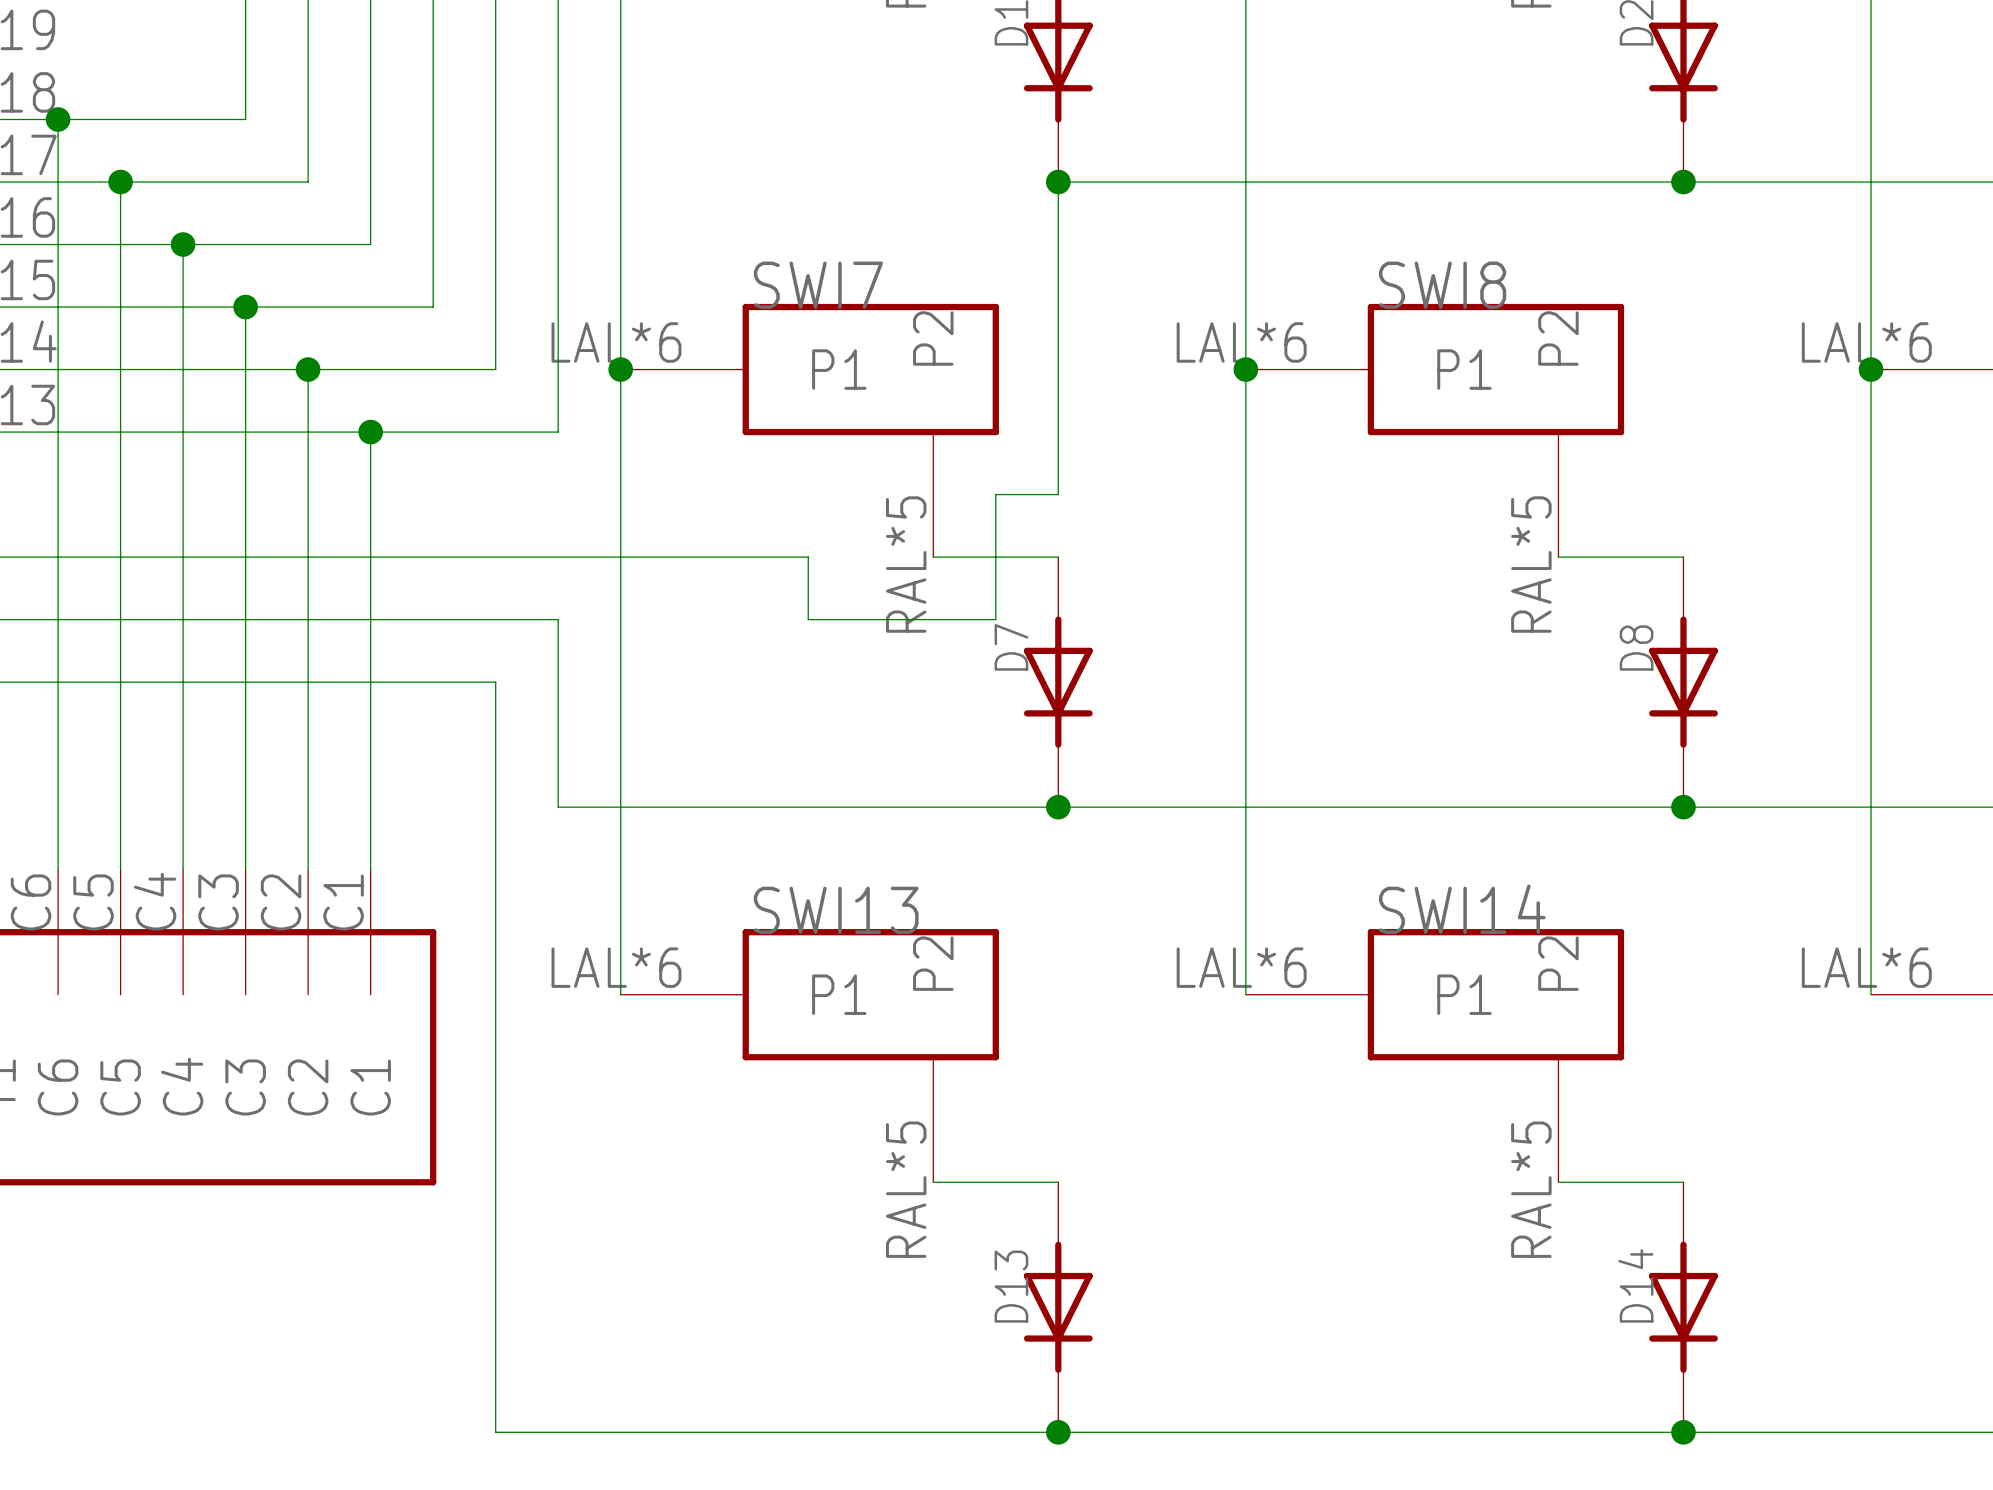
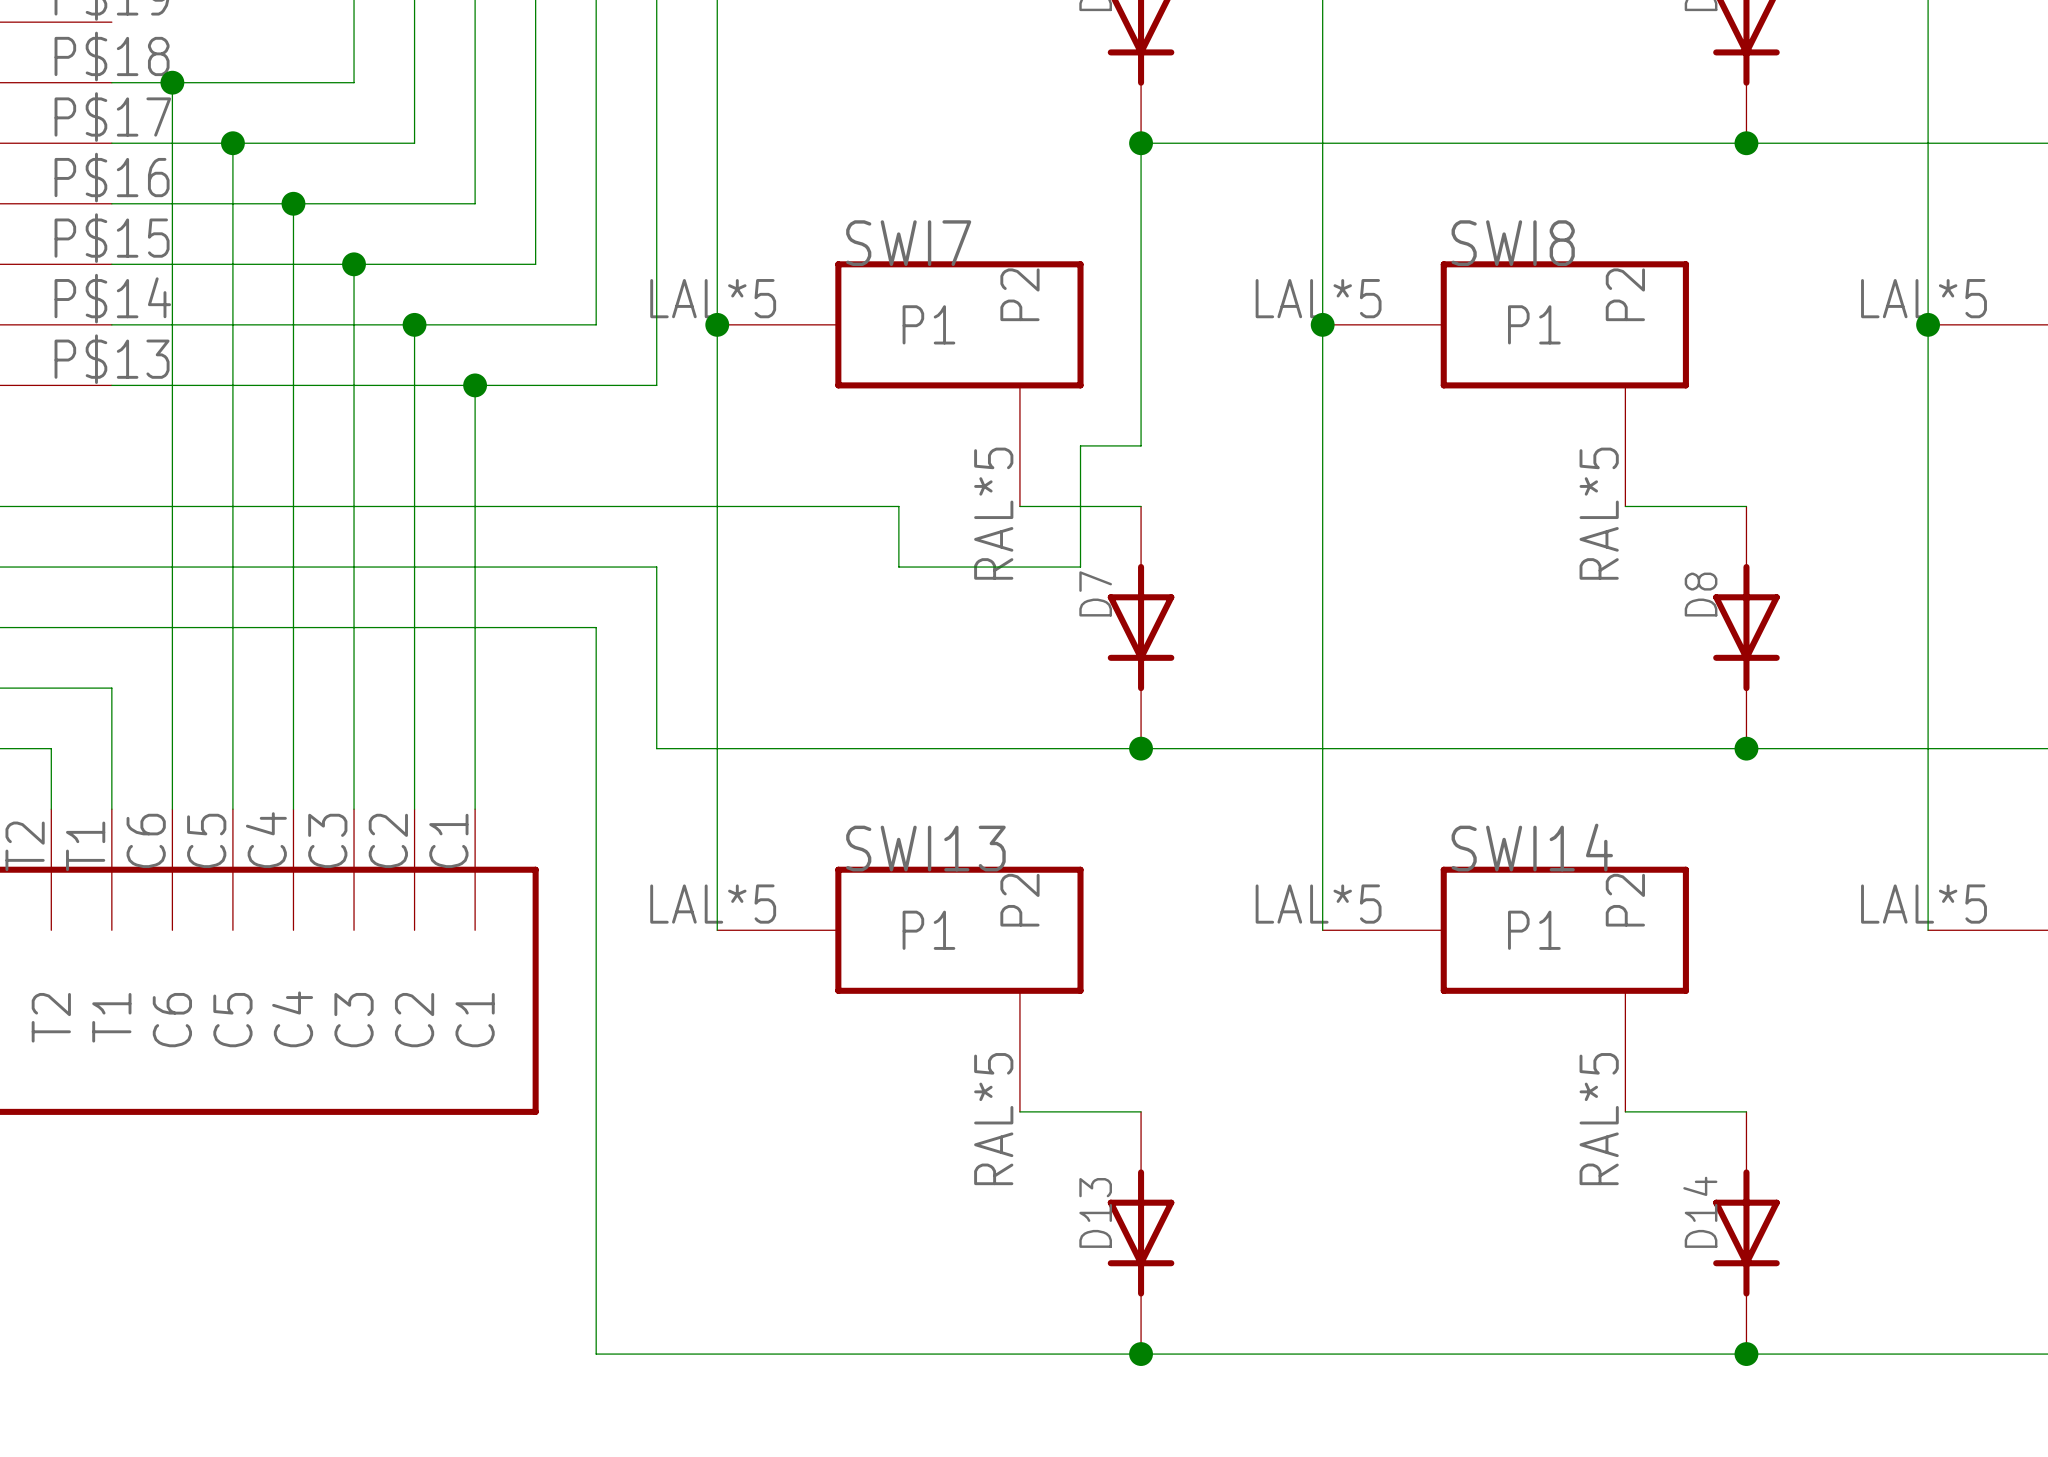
SWI7 pin number: LAL*6 (616, 342) -> LAL*5 (713, 298)
SWI8 pin number: LAL*6 (1241, 342) -> LAL*5 (1318, 298)
part pin number: LAL*6 (1866, 342) -> LAL*5 (1924, 298)
SWI13 pin number: LAL*6 (616, 967) -> LAL*5 (713, 904)
SWI14 pin number: LAL*6 (1241, 967) -> LAL*5 (1318, 904)
part pin number: LAL*6 (1866, 967) -> LAL*5 (1924, 904)

